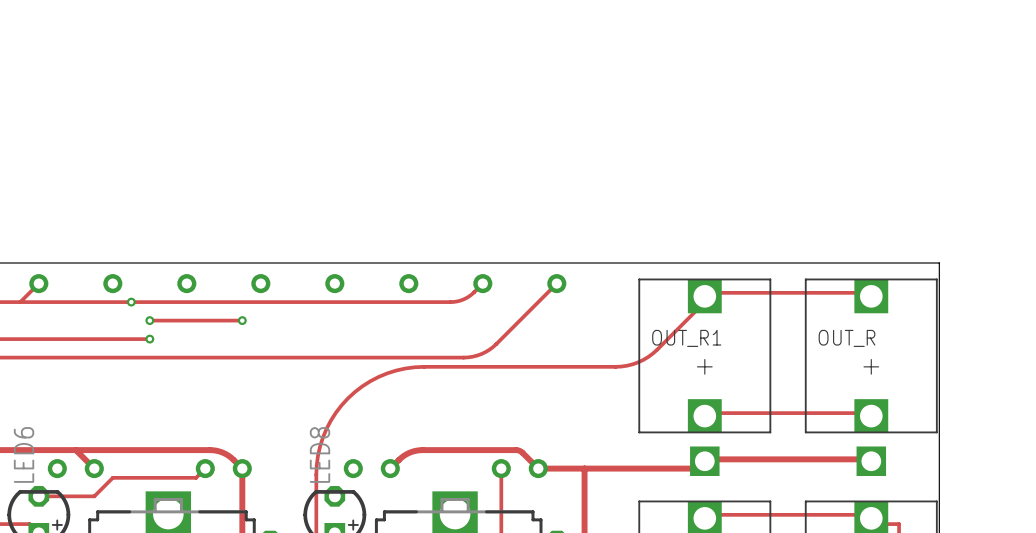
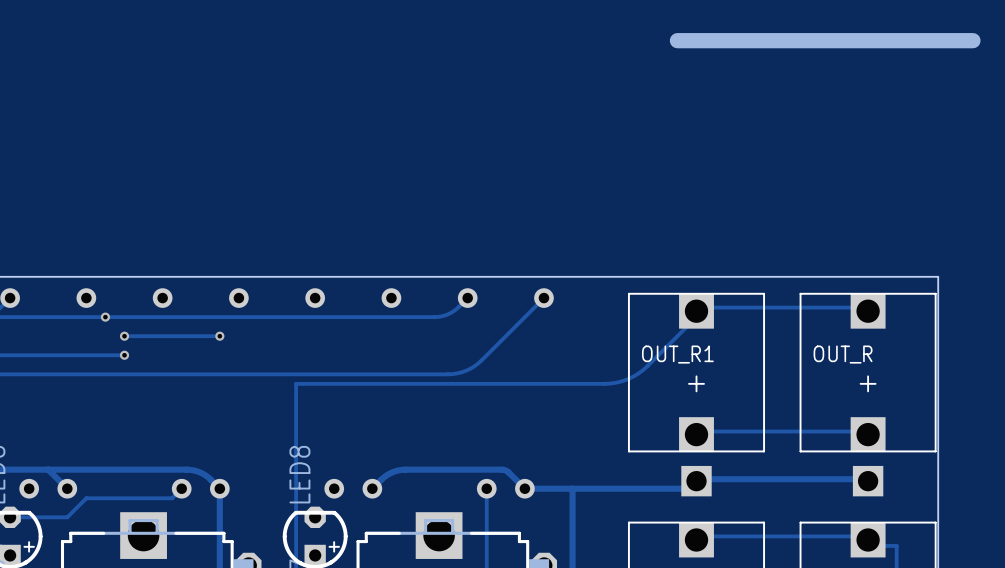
line: none -> (677, 40) (972, 40)
track: (424, 366) (405, 368) (378, 376) (362, 386) (347, 398) (335, 412) (326, 429) (317, 455) (316, 474) -> (407, 383) (296, 383) (296, 495)

